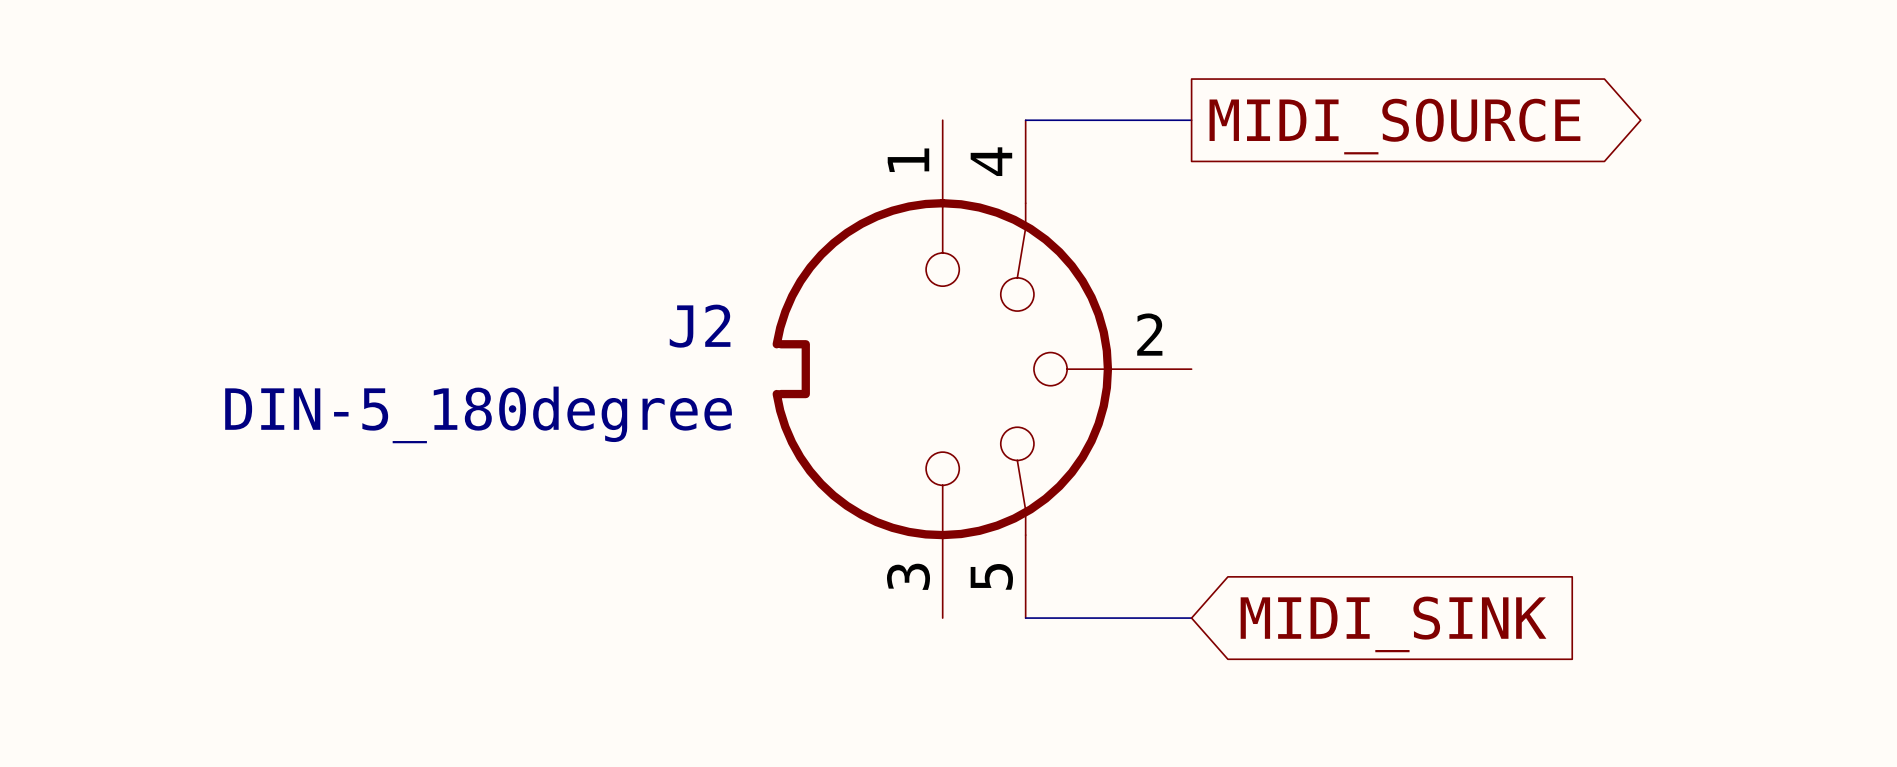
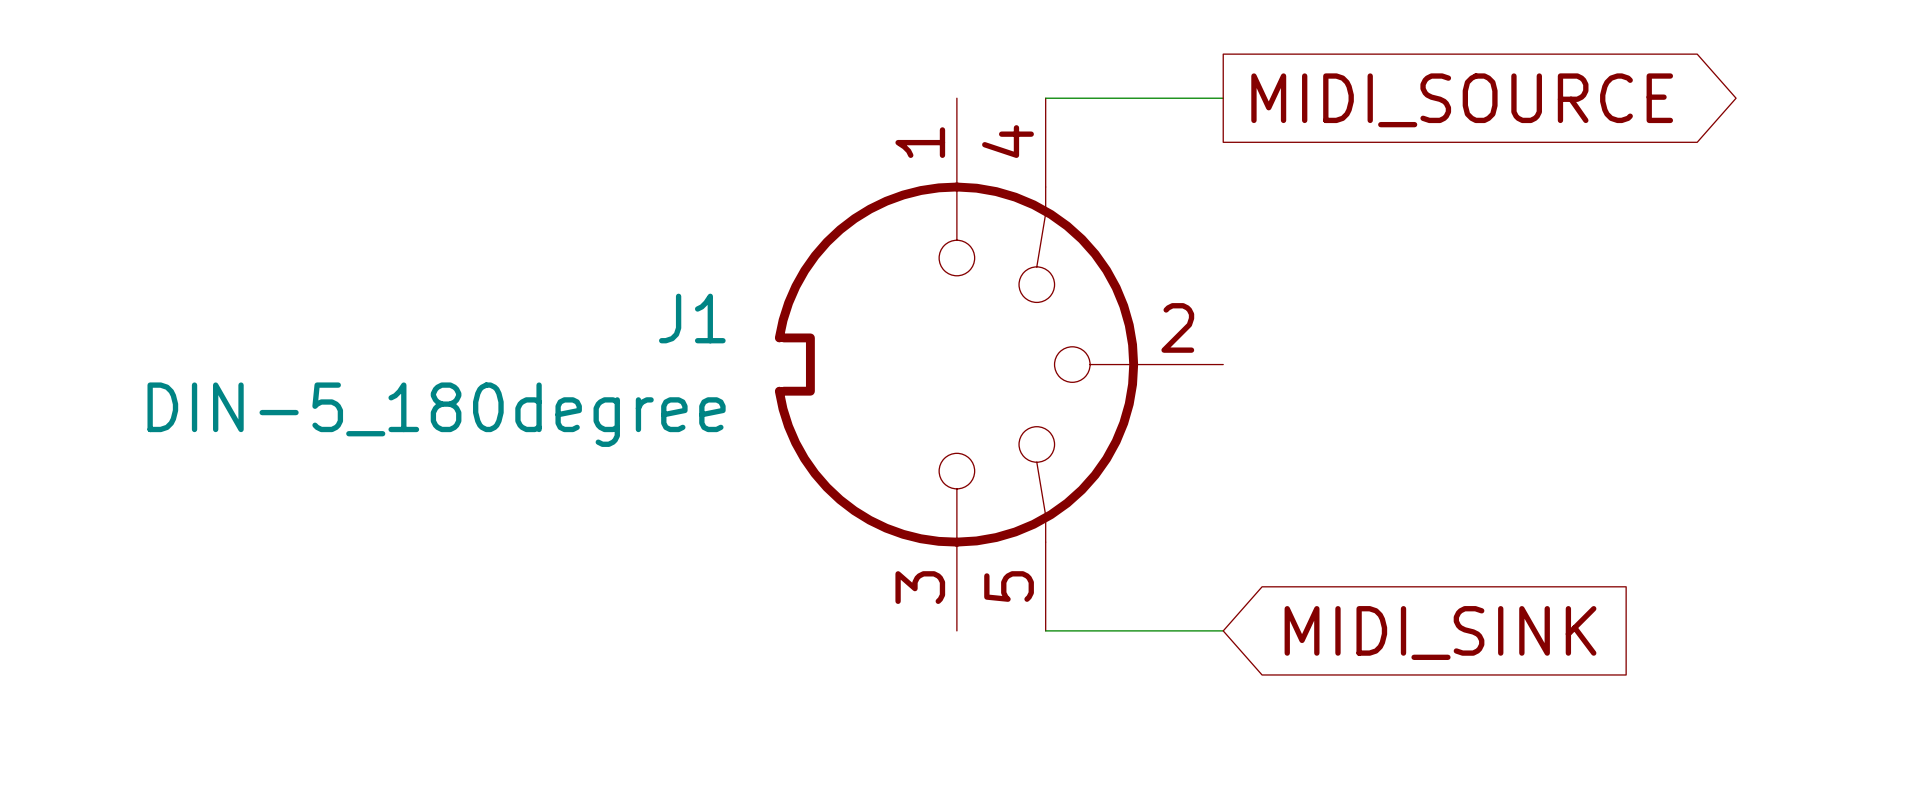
J2 name: J2 (700, 326) -> J1 (692, 318)

